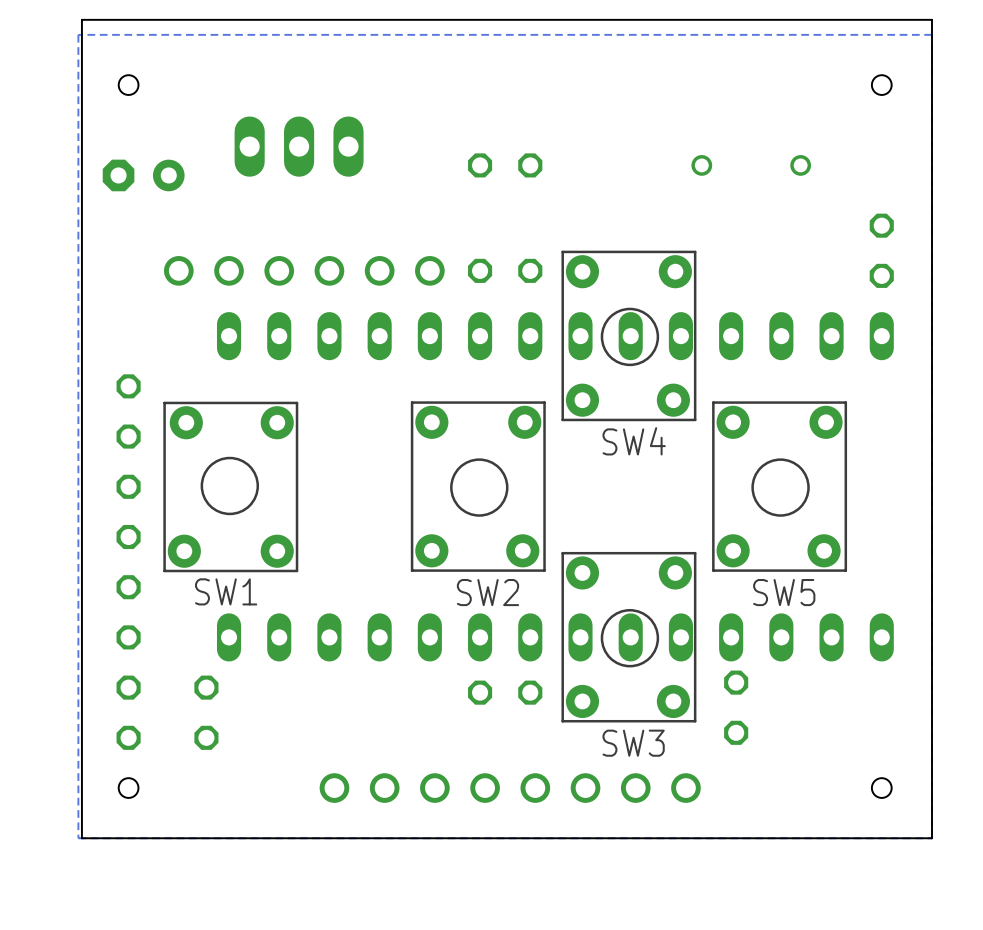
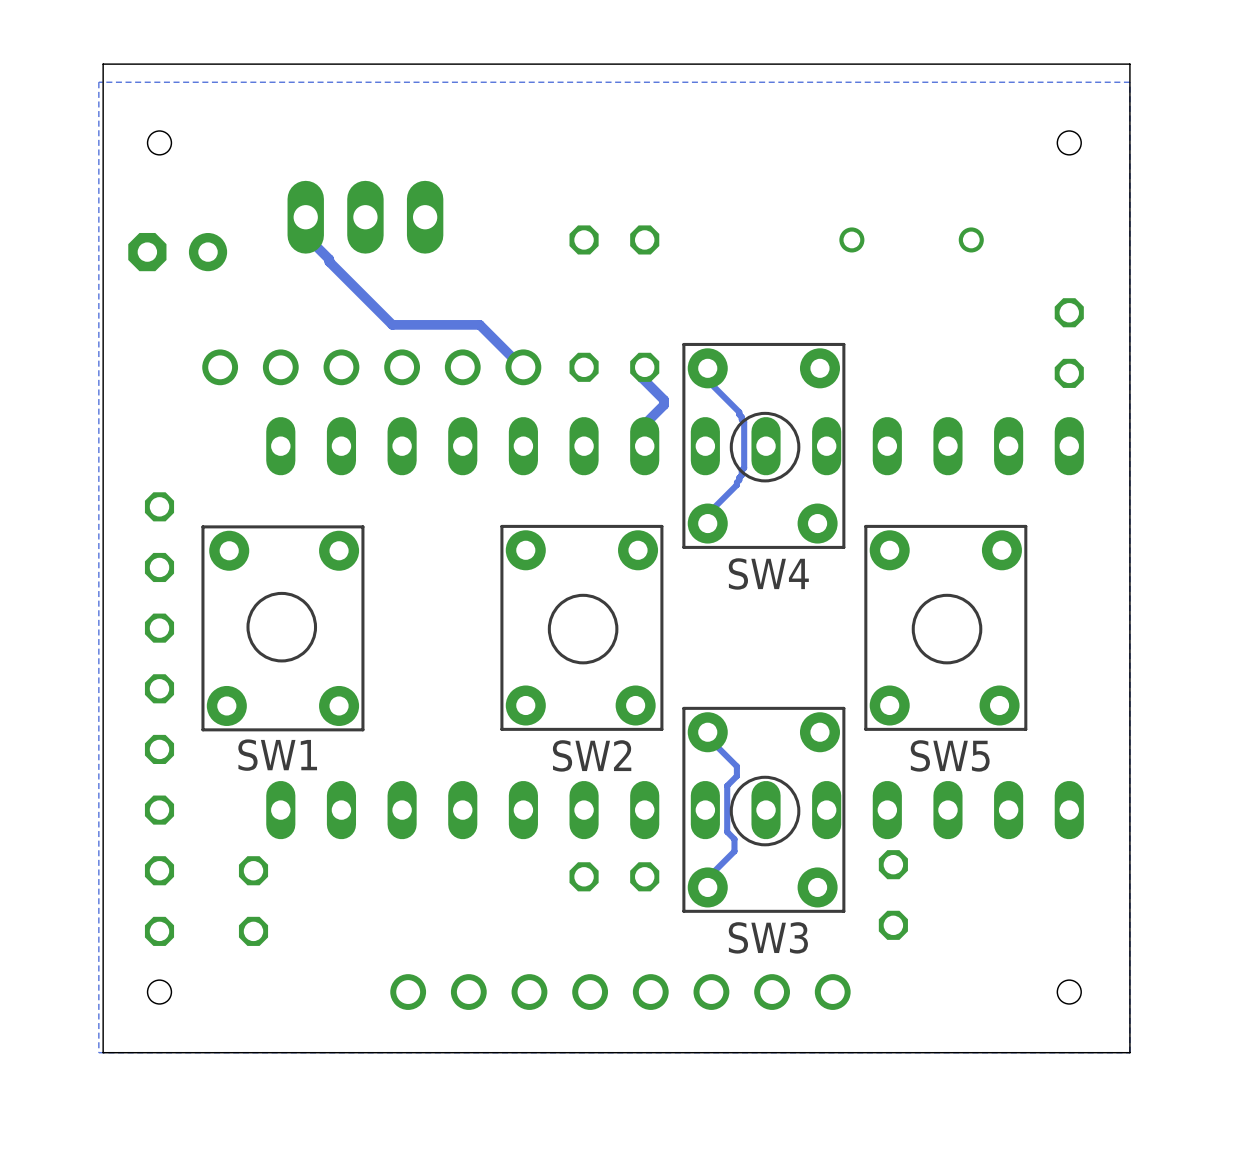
track: none -> (305, 217) (307, 218) (307, 237) (392, 324) (479, 324) (523, 367)
track: none -> (644, 367) (642, 370) (642, 378) (664, 400) (664, 404) (644, 424) (644, 446)
track: none -> (707, 368) (707, 380) (739, 412) (744, 421) (744, 468) (736, 484) (707, 514) (707, 523)
track: none -> (707, 732) (707, 737) (736, 766) (736, 776) (727, 785) (727, 831) (734, 839) (734, 851) (707, 878) (707, 887)

